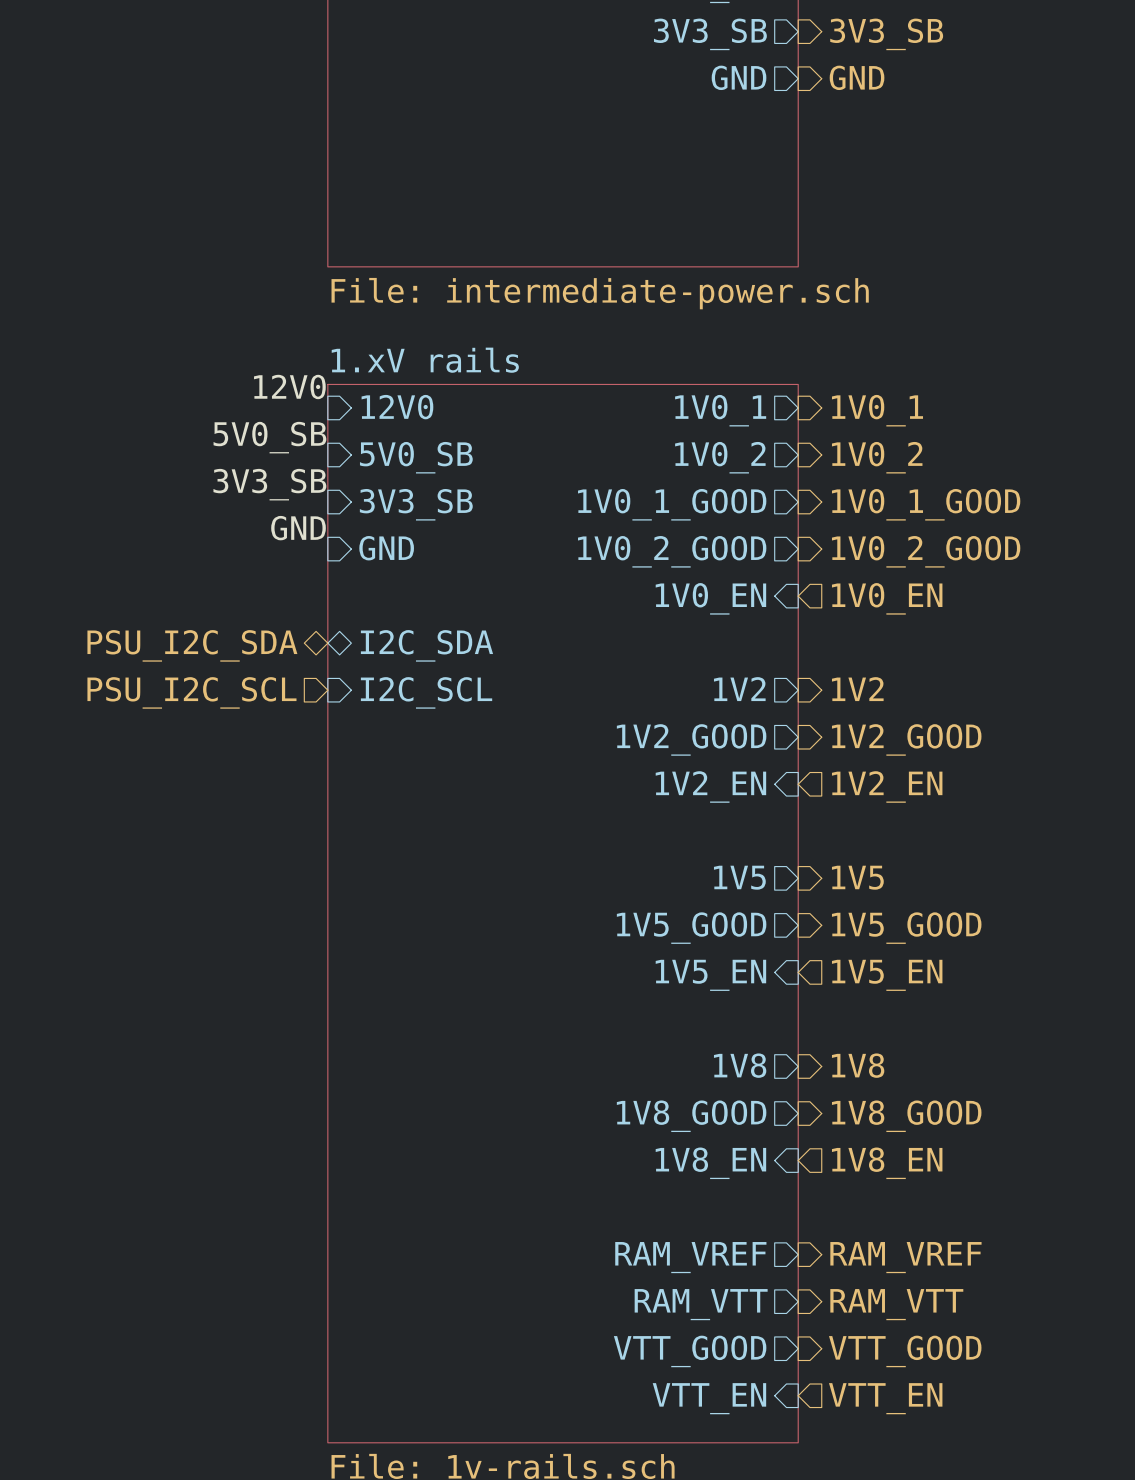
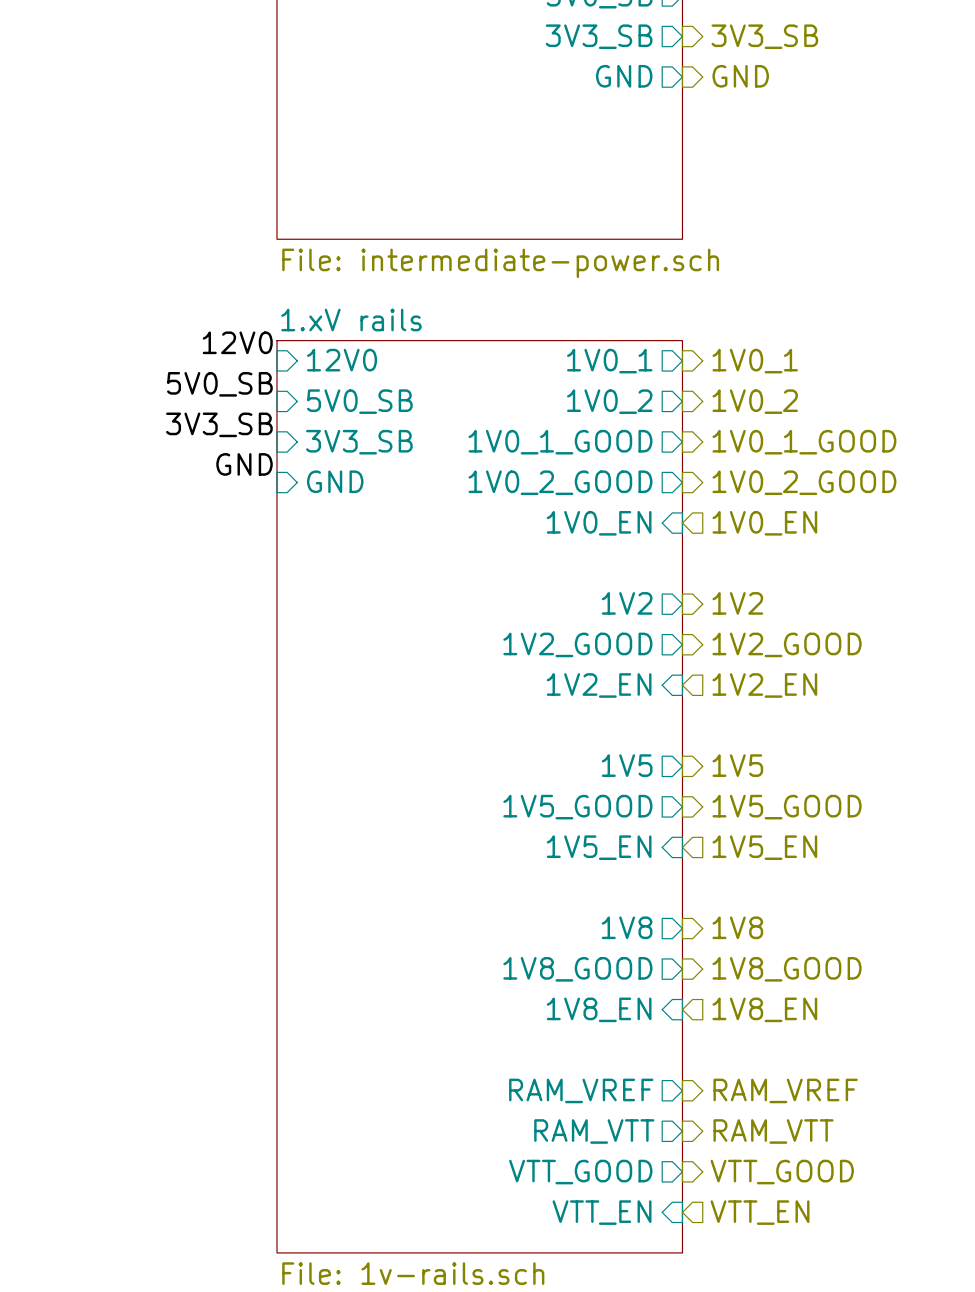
hierarchical label: PSU_I2C_SDA (192, 645) -> none
sheet pin: I2C_SDA (426, 645) -> none
hierarchical label: PSU_I2C_SCL (191, 692) -> none
sheet pin: I2C_SCL (426, 692) -> none

